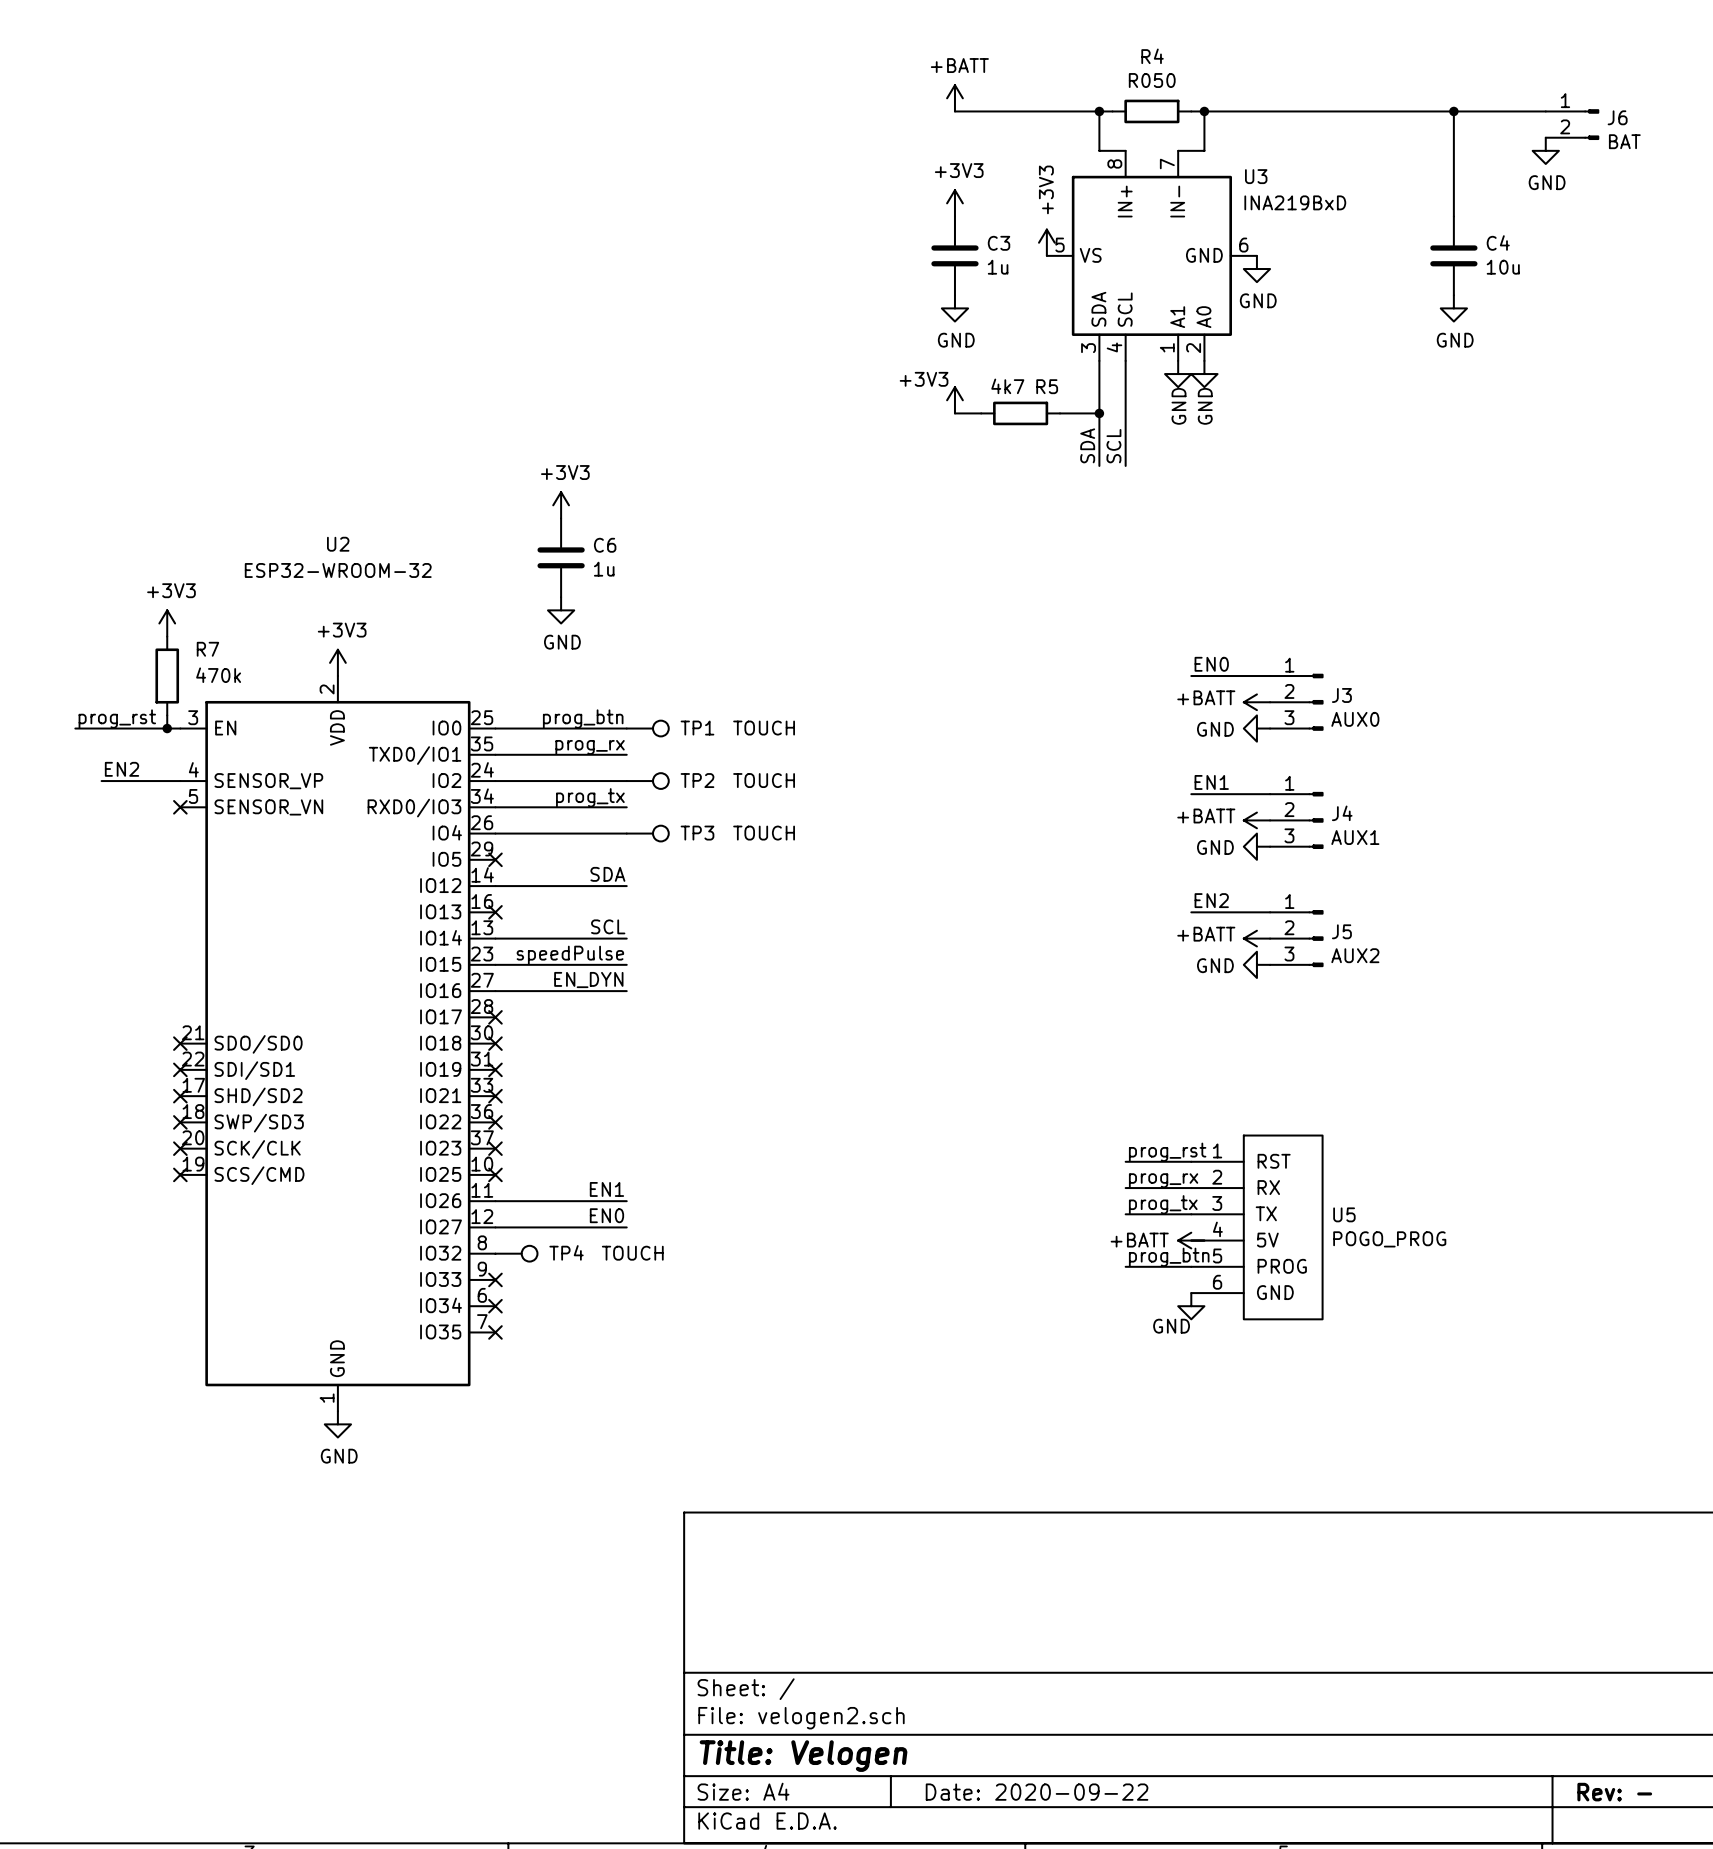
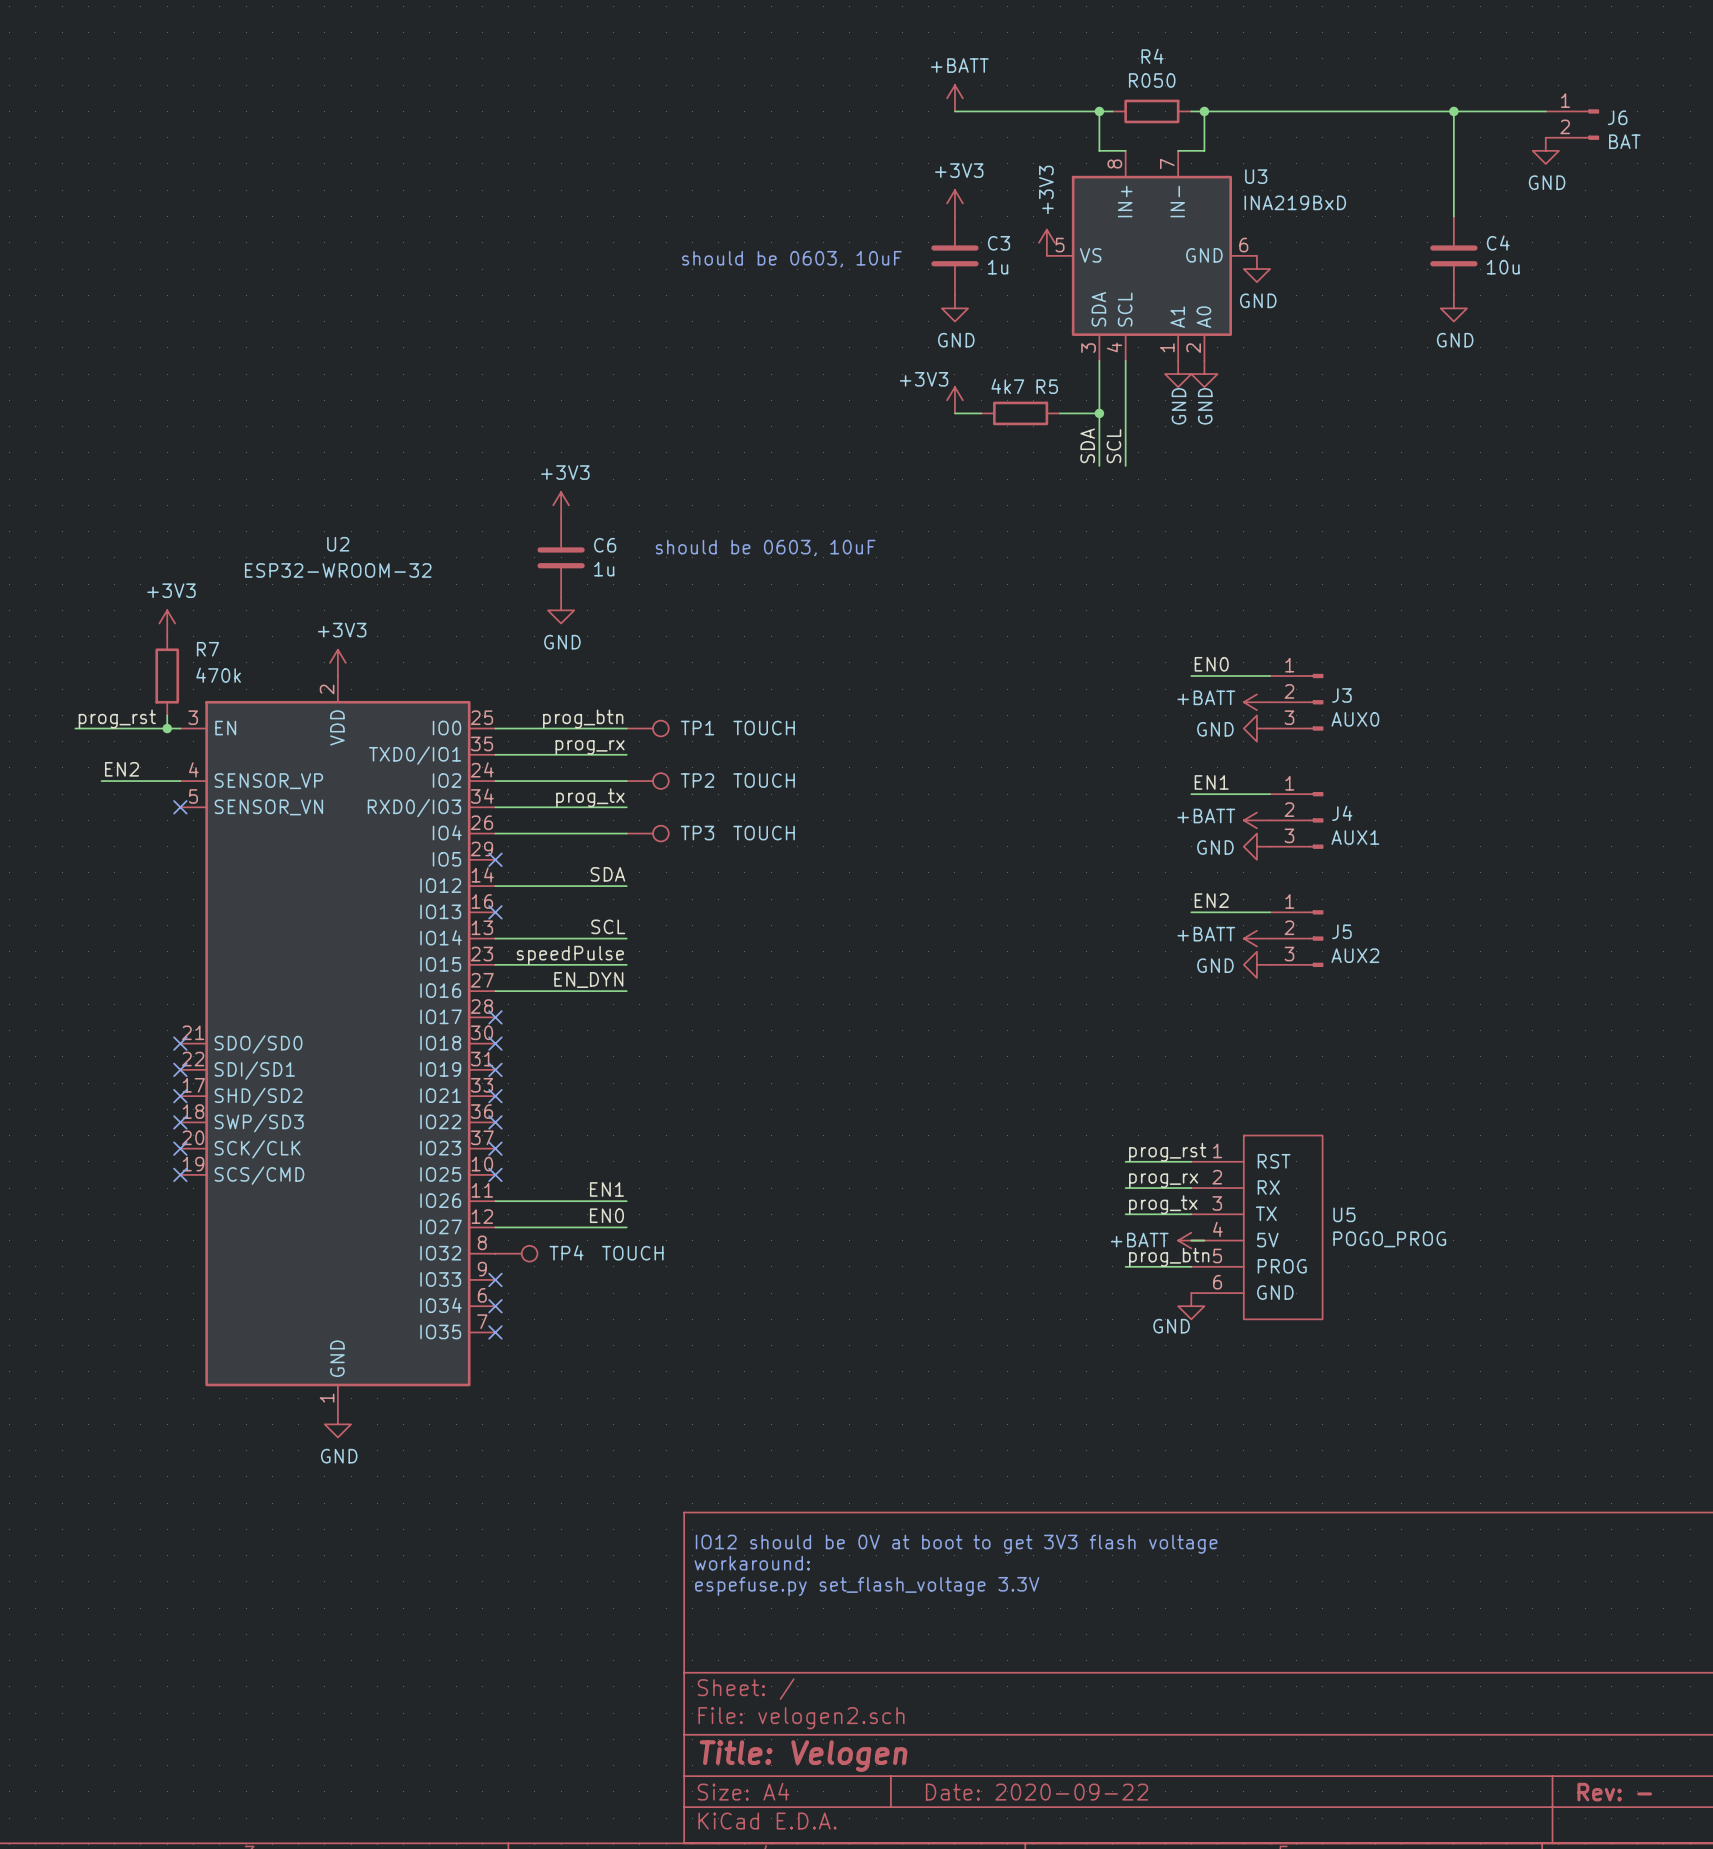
text: none -> should be 0603, 10uF (791, 259)
text: none -> should be 0603, 10uF (765, 548)
text: none -> IO12 should be 0V at boot to get 3V3 flash voltage (956, 1544)
text: none -> workaround: (752, 1563)
text: none -> espefuse.py set_flash_voltage 3.3V (867, 1586)

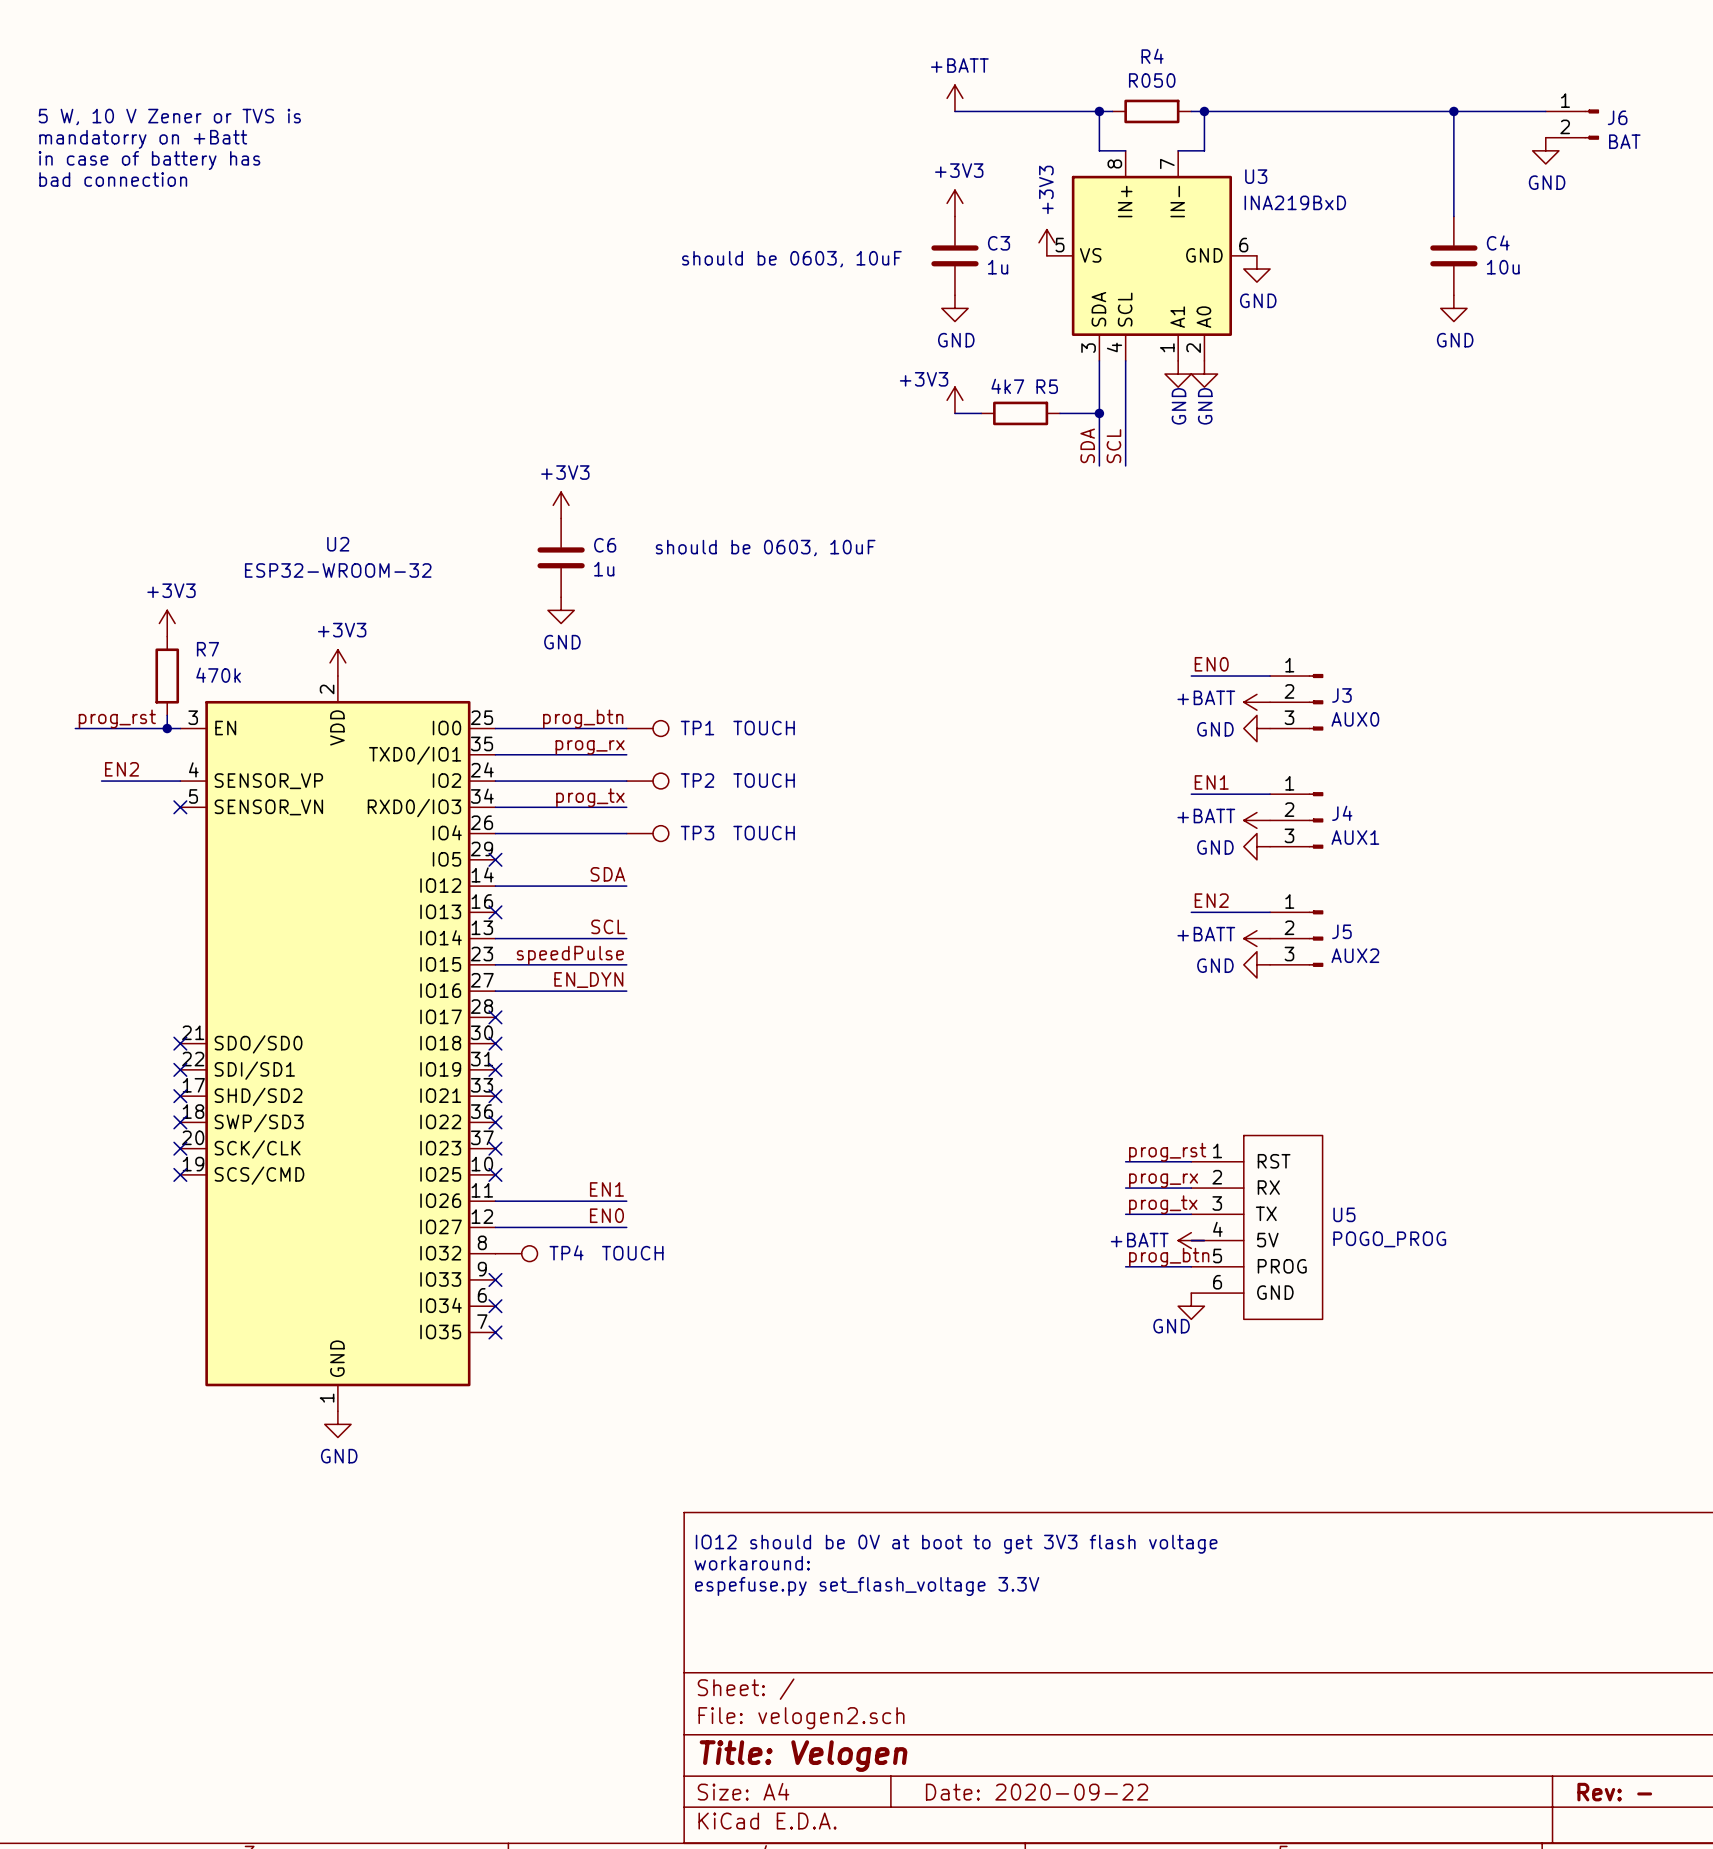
text: none -> 5 W, 10 V Zener or TVS is (169, 117)
text: none -> mandatorry on +Batt (143, 139)
text: none -> in case of battery has (149, 160)
text: none -> bad connection (113, 179)

